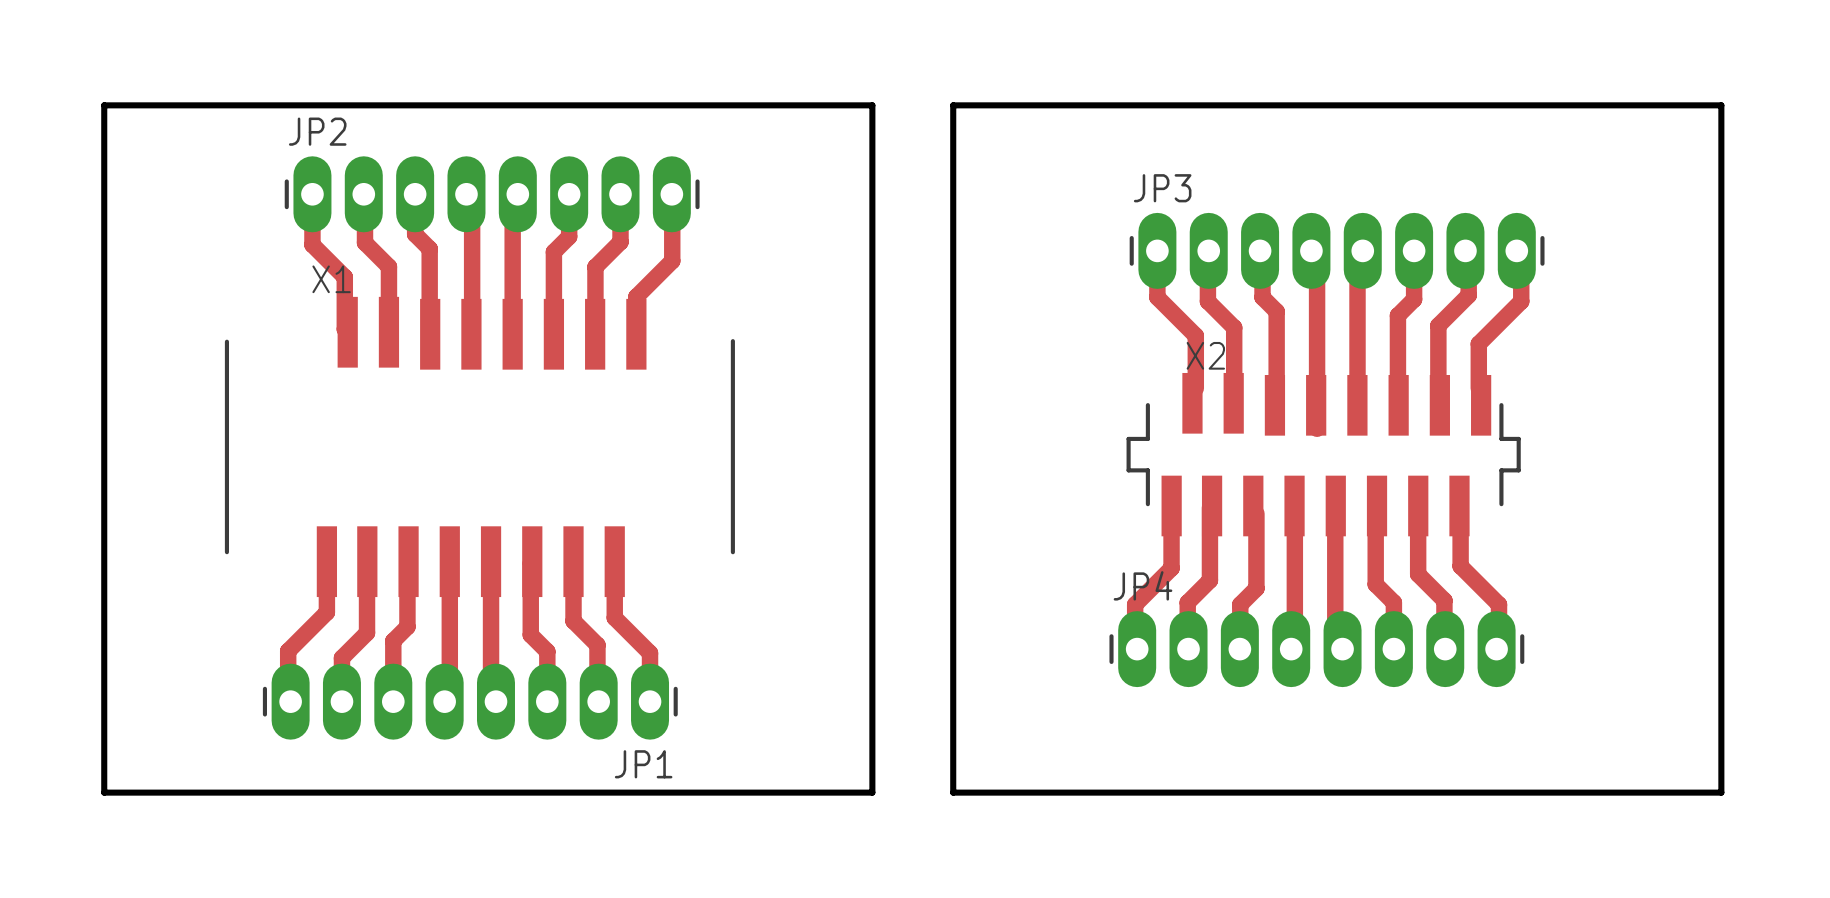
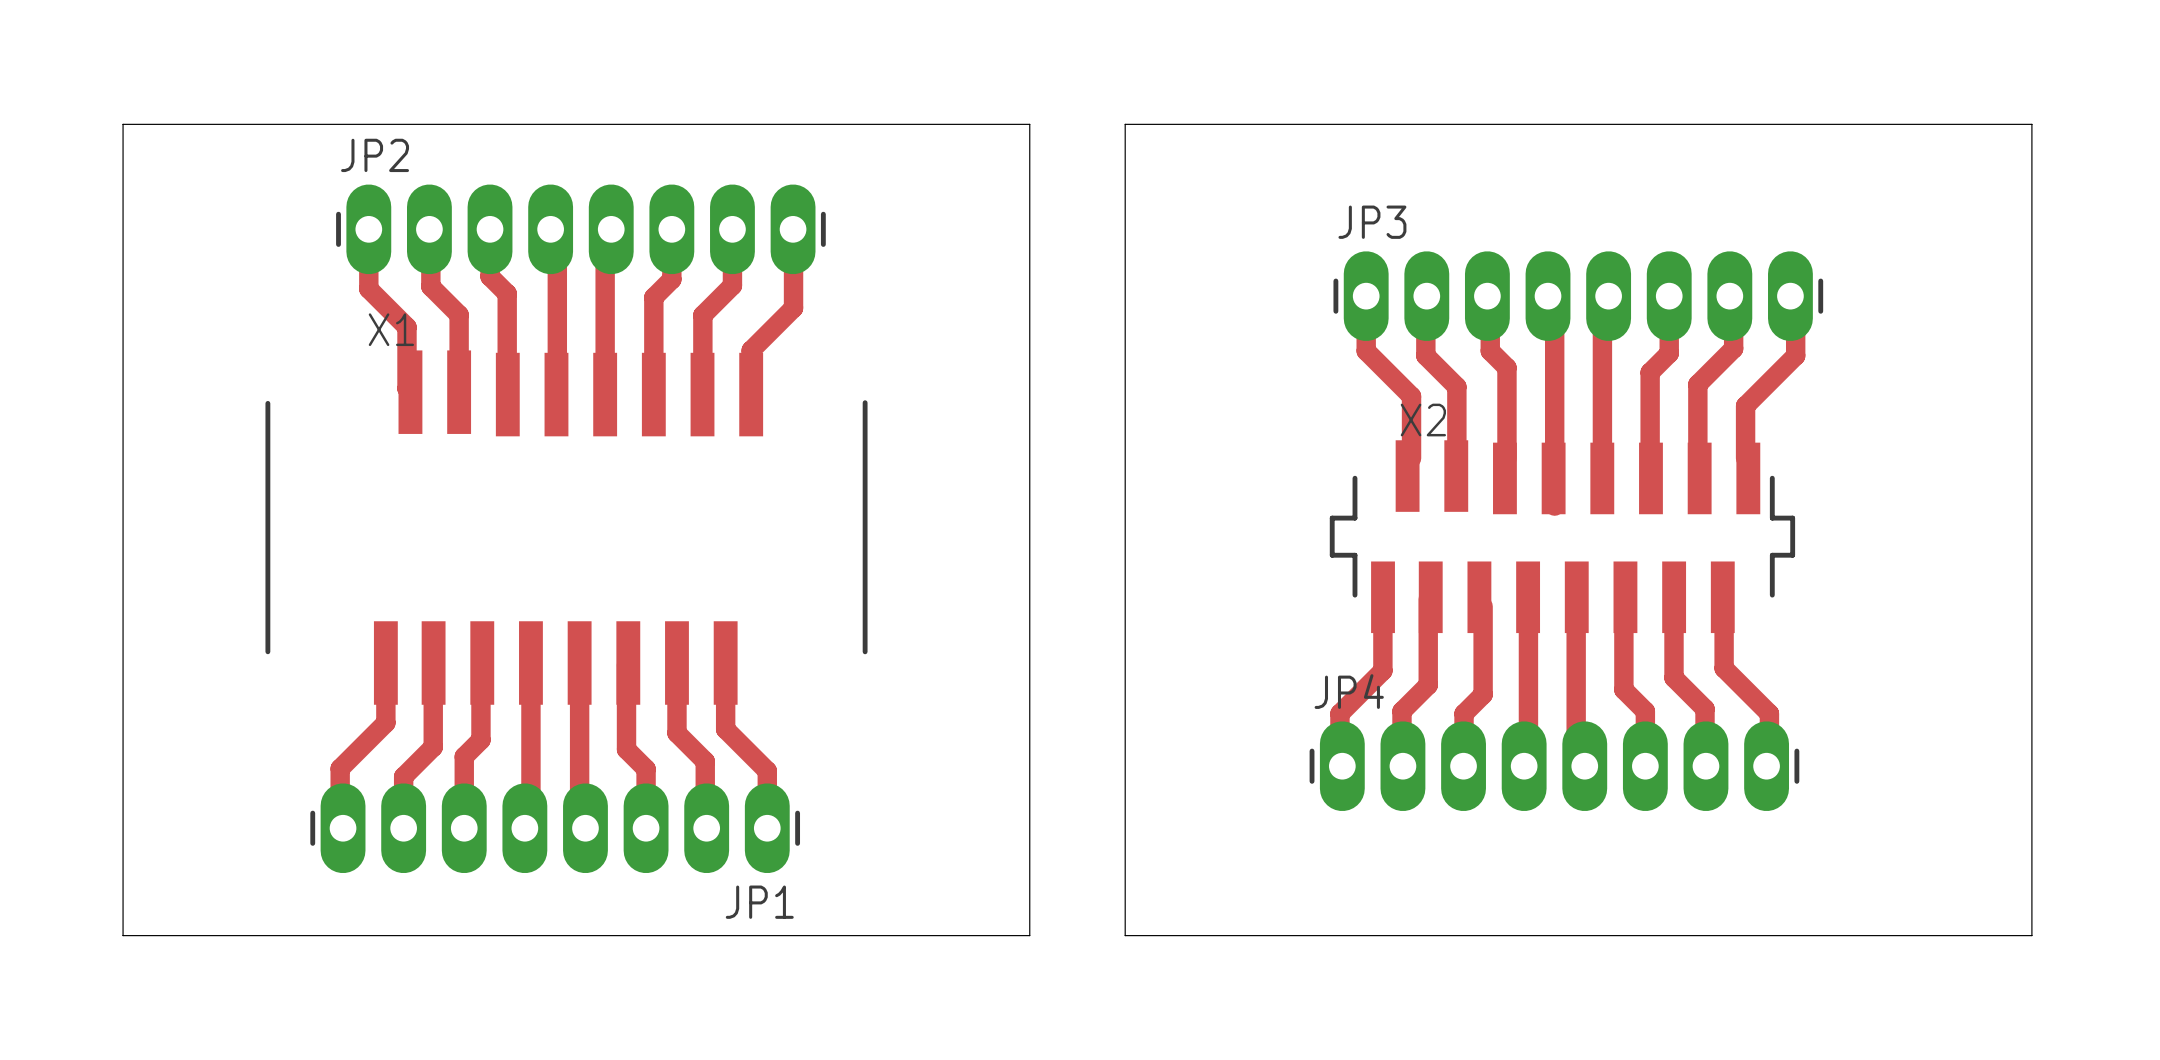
board edge width: thick (104, 105) (872, 105) (872, 792) (104, 792) (104, 105) -> thin (123, 124) (1029, 124) (1029, 935) (123, 935) (123, 124)
board edge width: thick (953, 105) (1721, 105) (1721, 792) (953, 792) (953, 105) -> thin (1125, 124) (2031, 124) (2031, 935) (1125, 935) (1125, 124)

